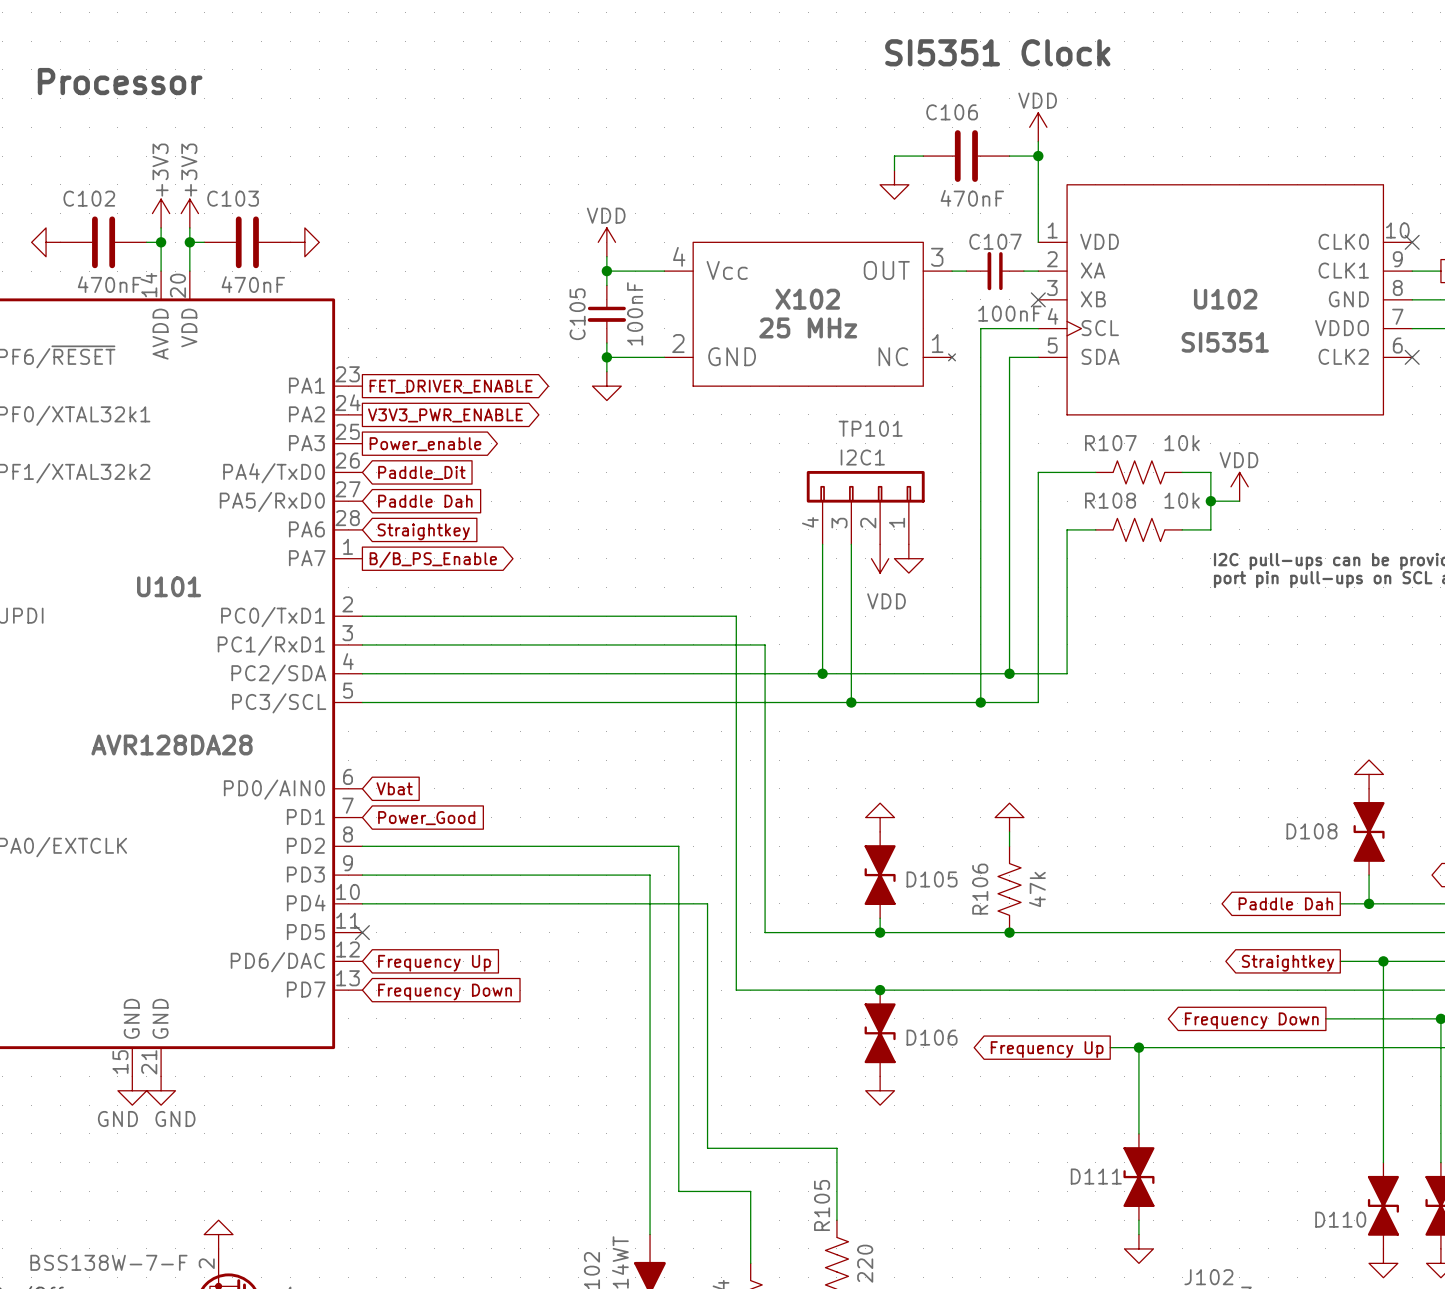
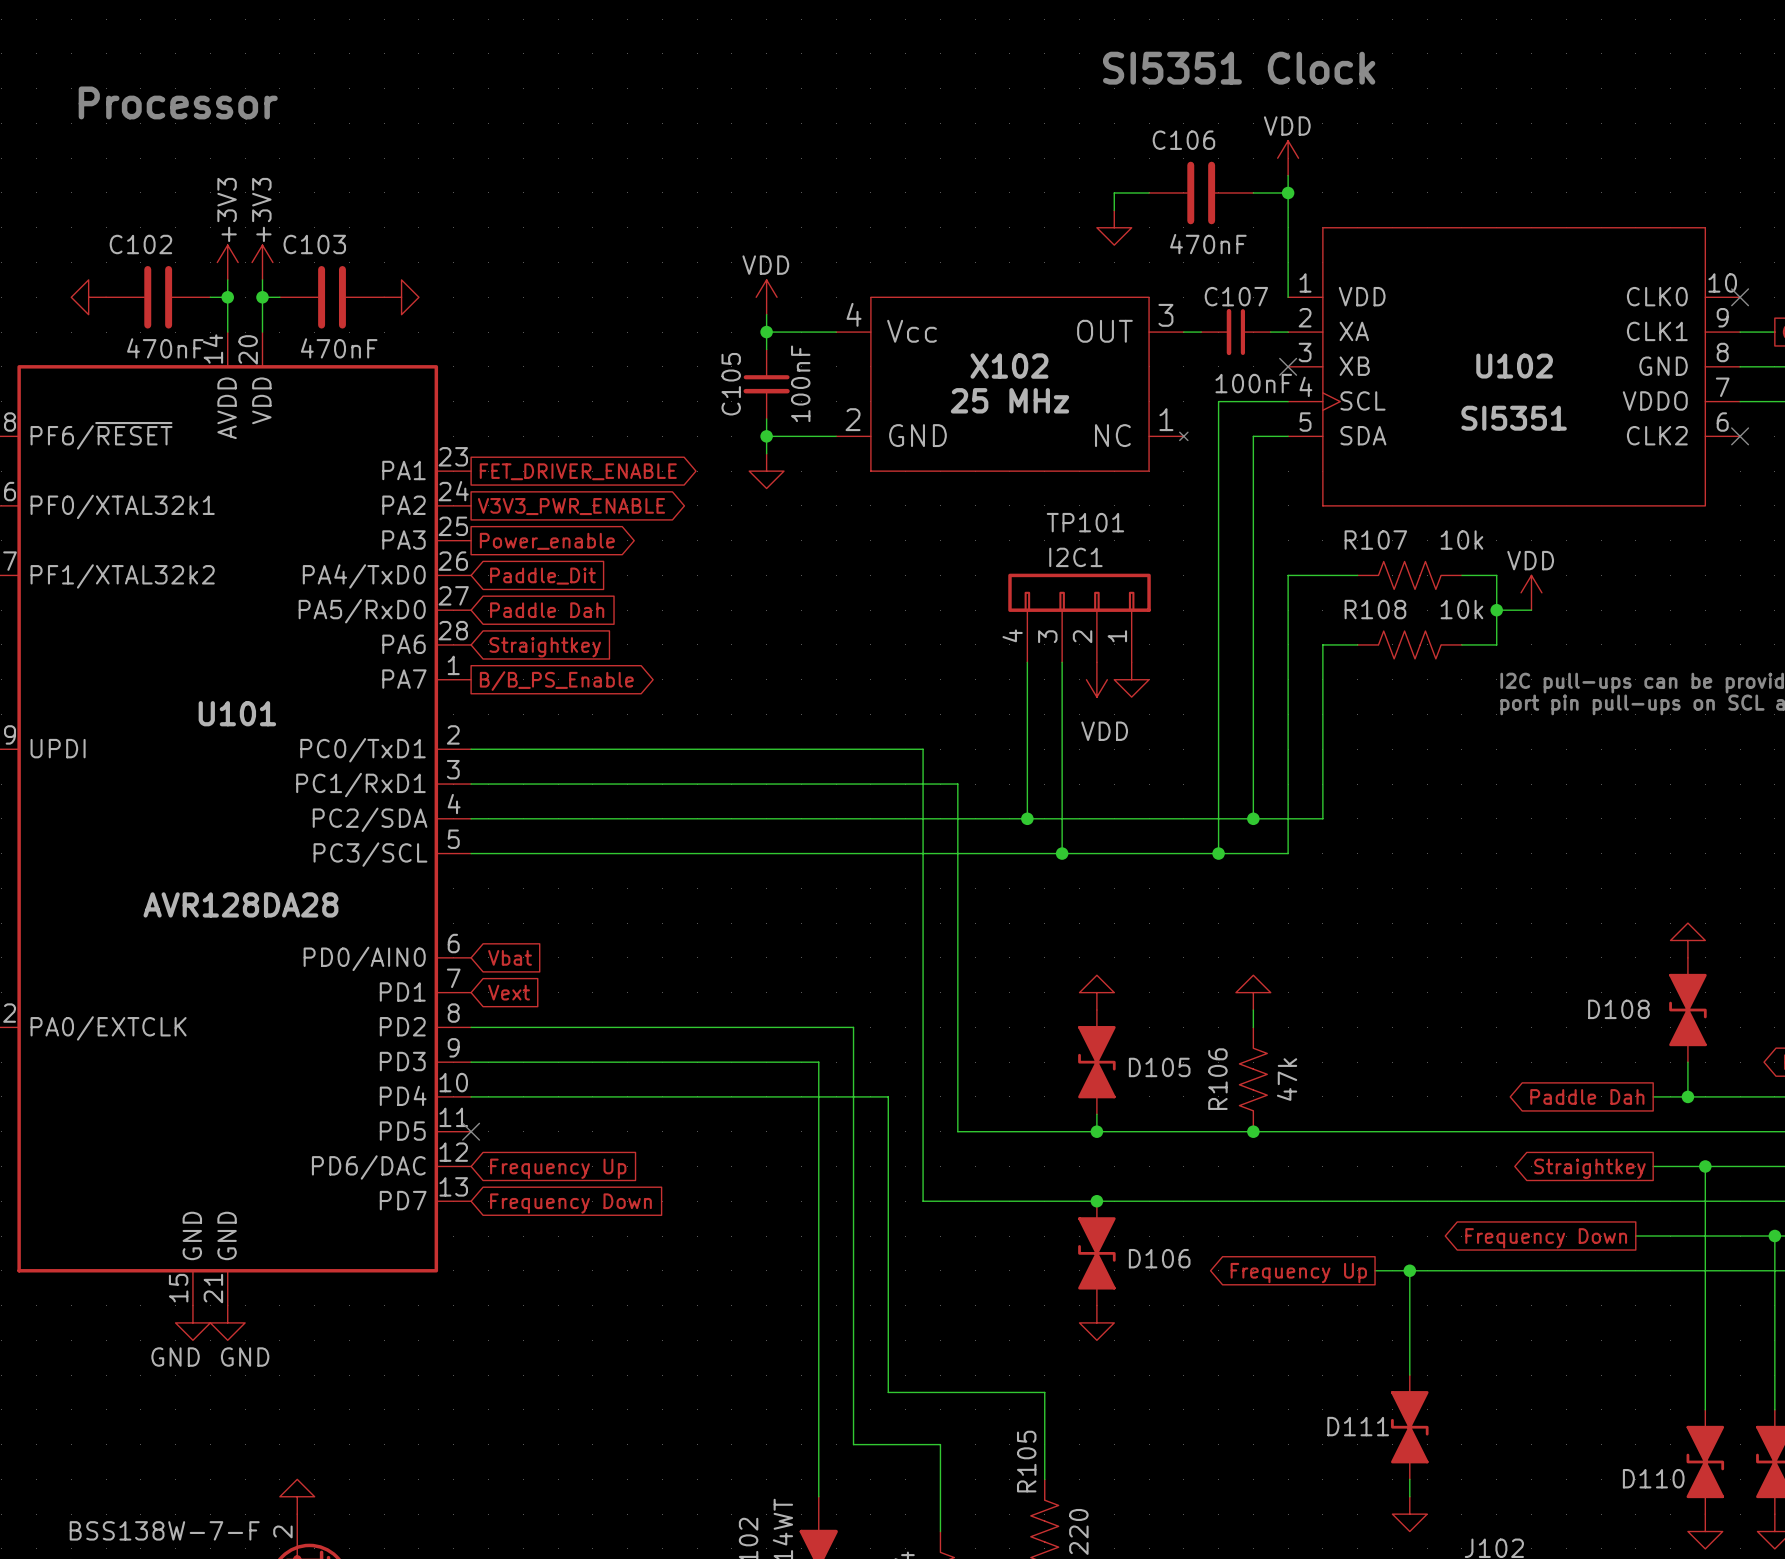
global label: Power_Good (426, 818) -> Vext (509, 992)

